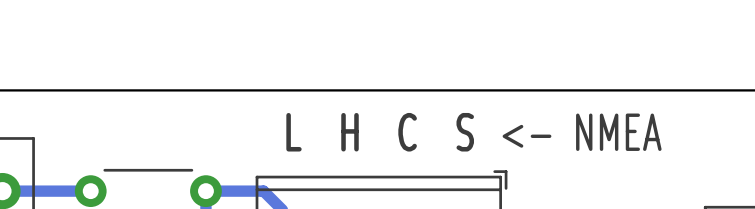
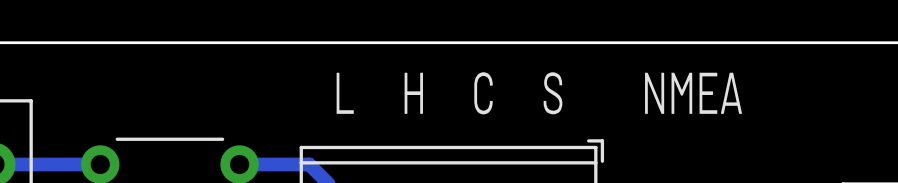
part value: <- NMEA (582, 132) -> NMEA (693, 93)

